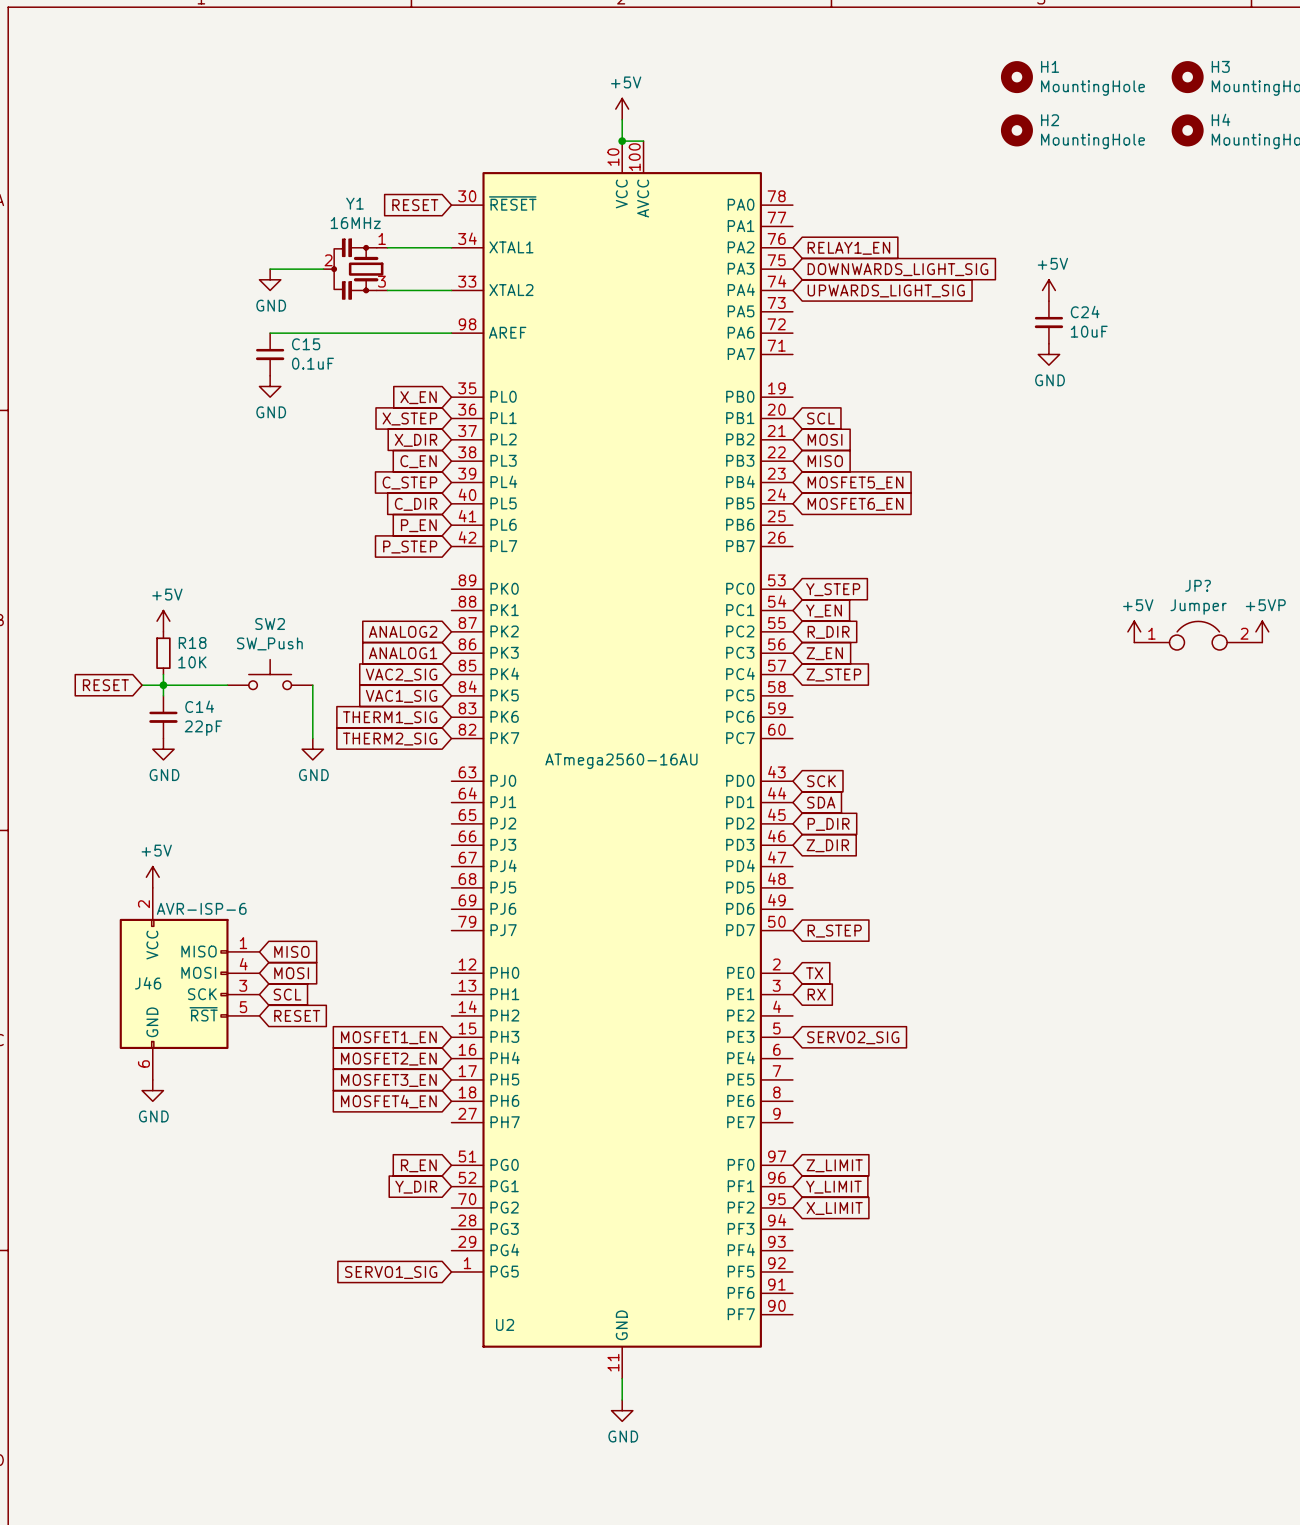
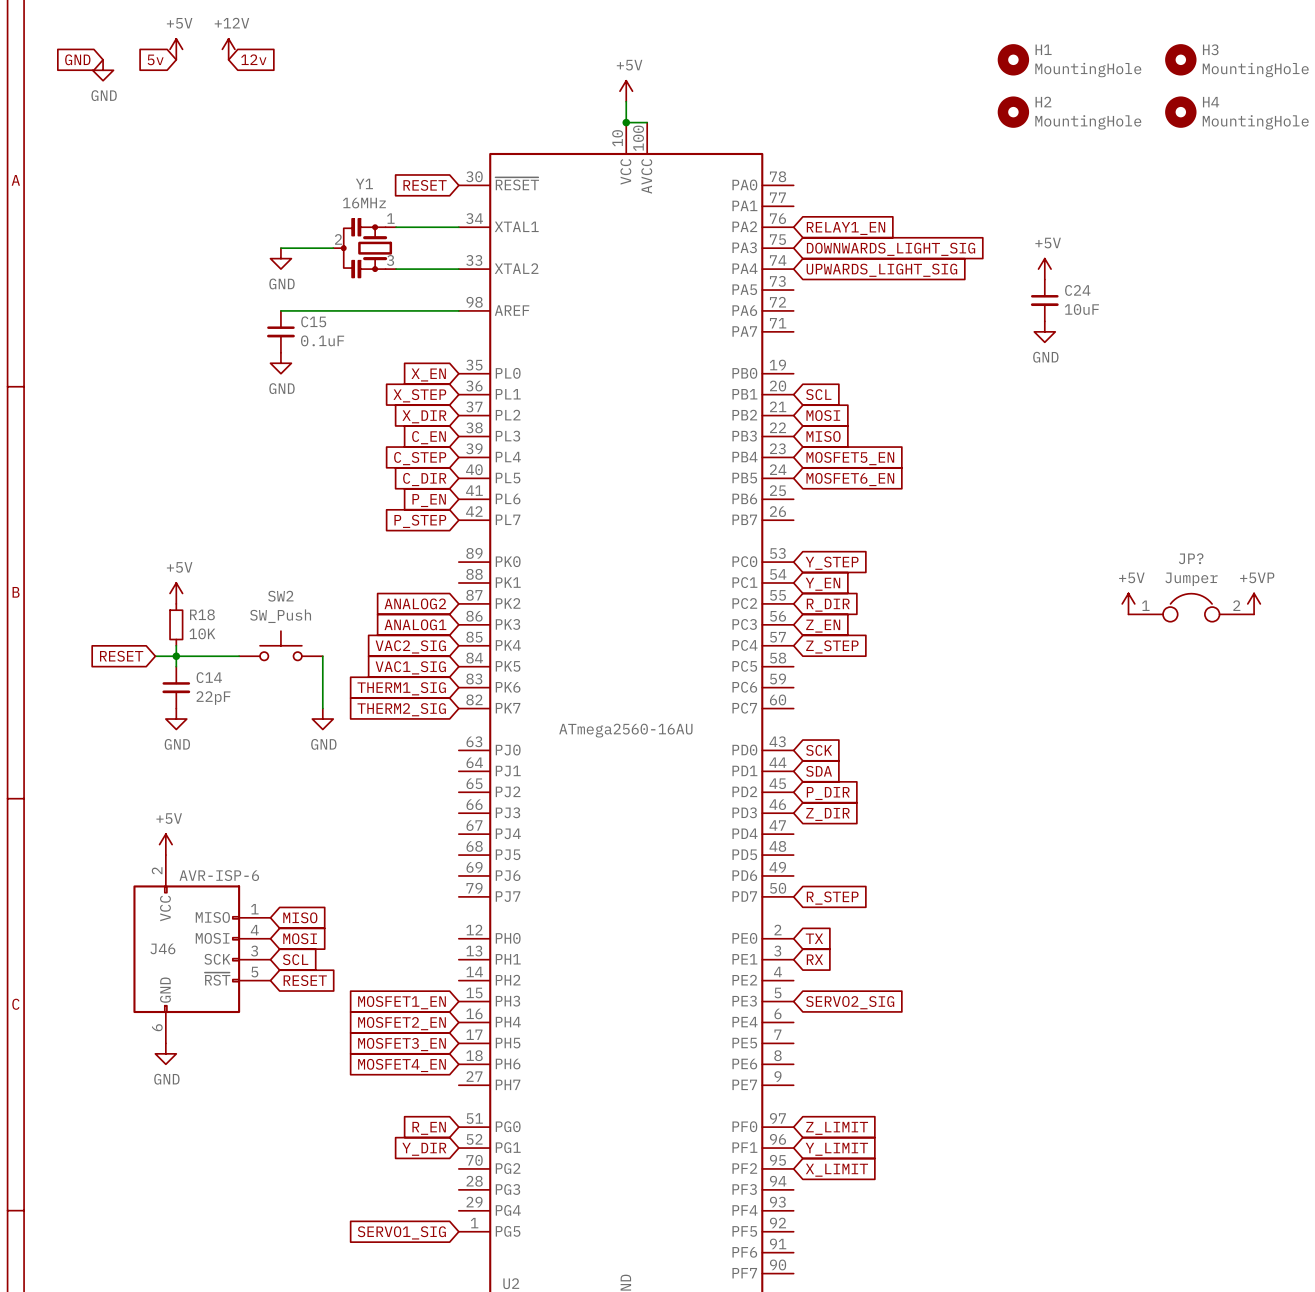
power symbol: none -> +5V (176, 49)
power symbol: none -> +12V (228, 49)
global label: none -> GND (77, 59)
global label: none -> 5v (155, 59)
global label: none -> 12v (253, 59)
power symbol: none -> GND (103, 70)

